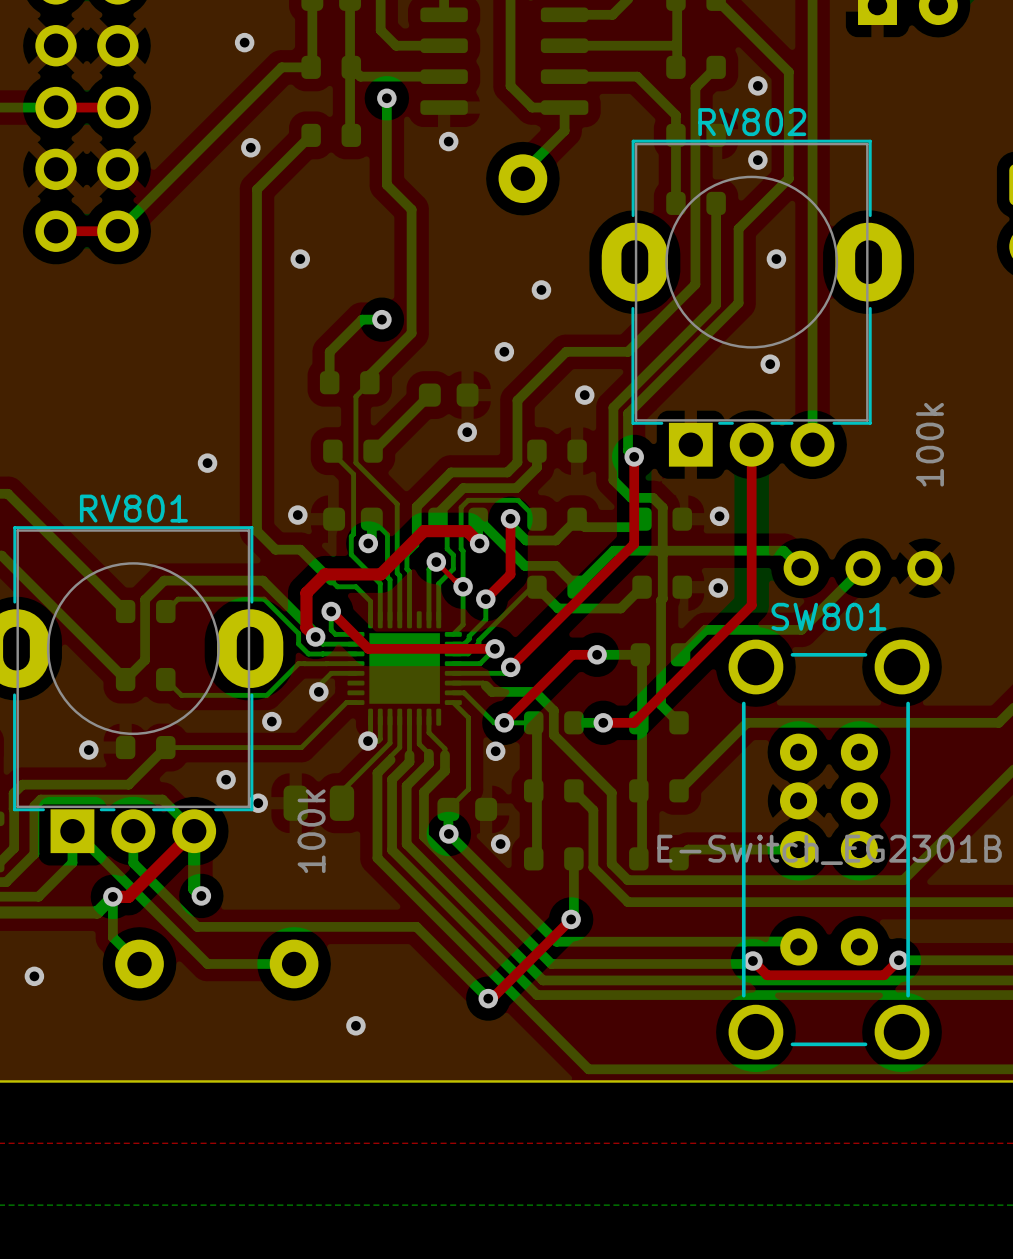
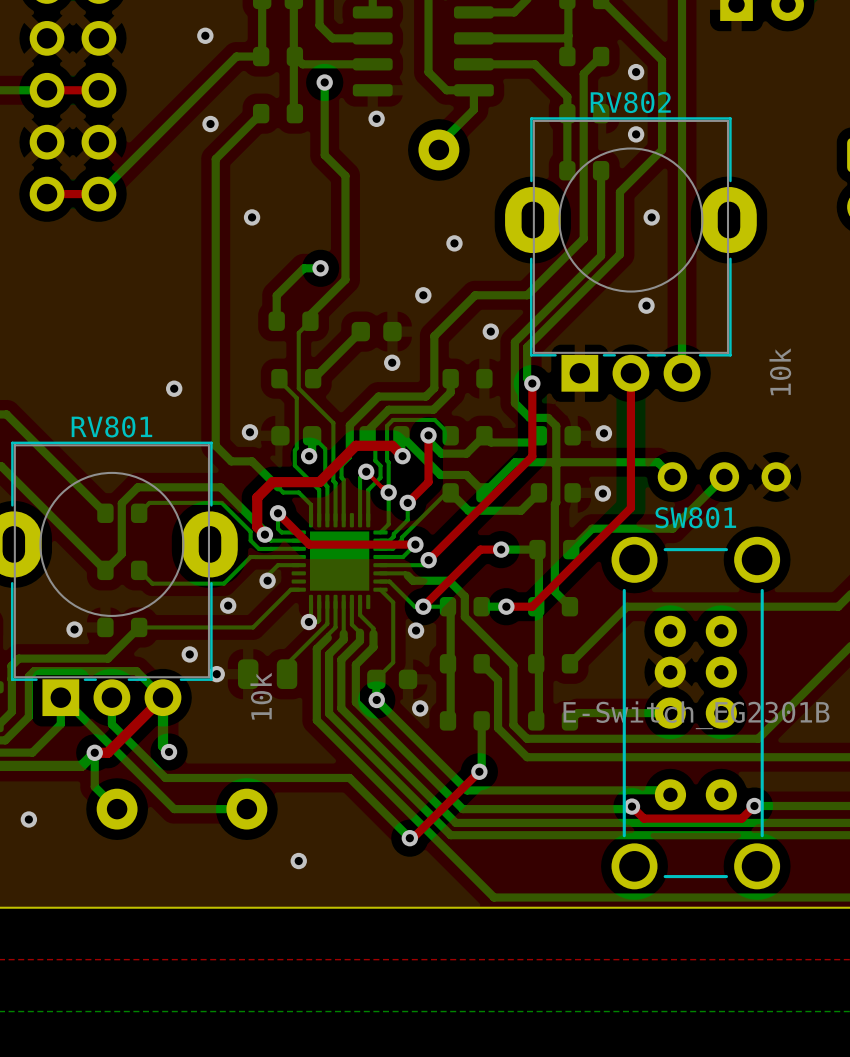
RV802 value: 100k (929, 444) -> 10k (780, 371)
RV801 value: 100k (311, 831) -> 10k (261, 696)

